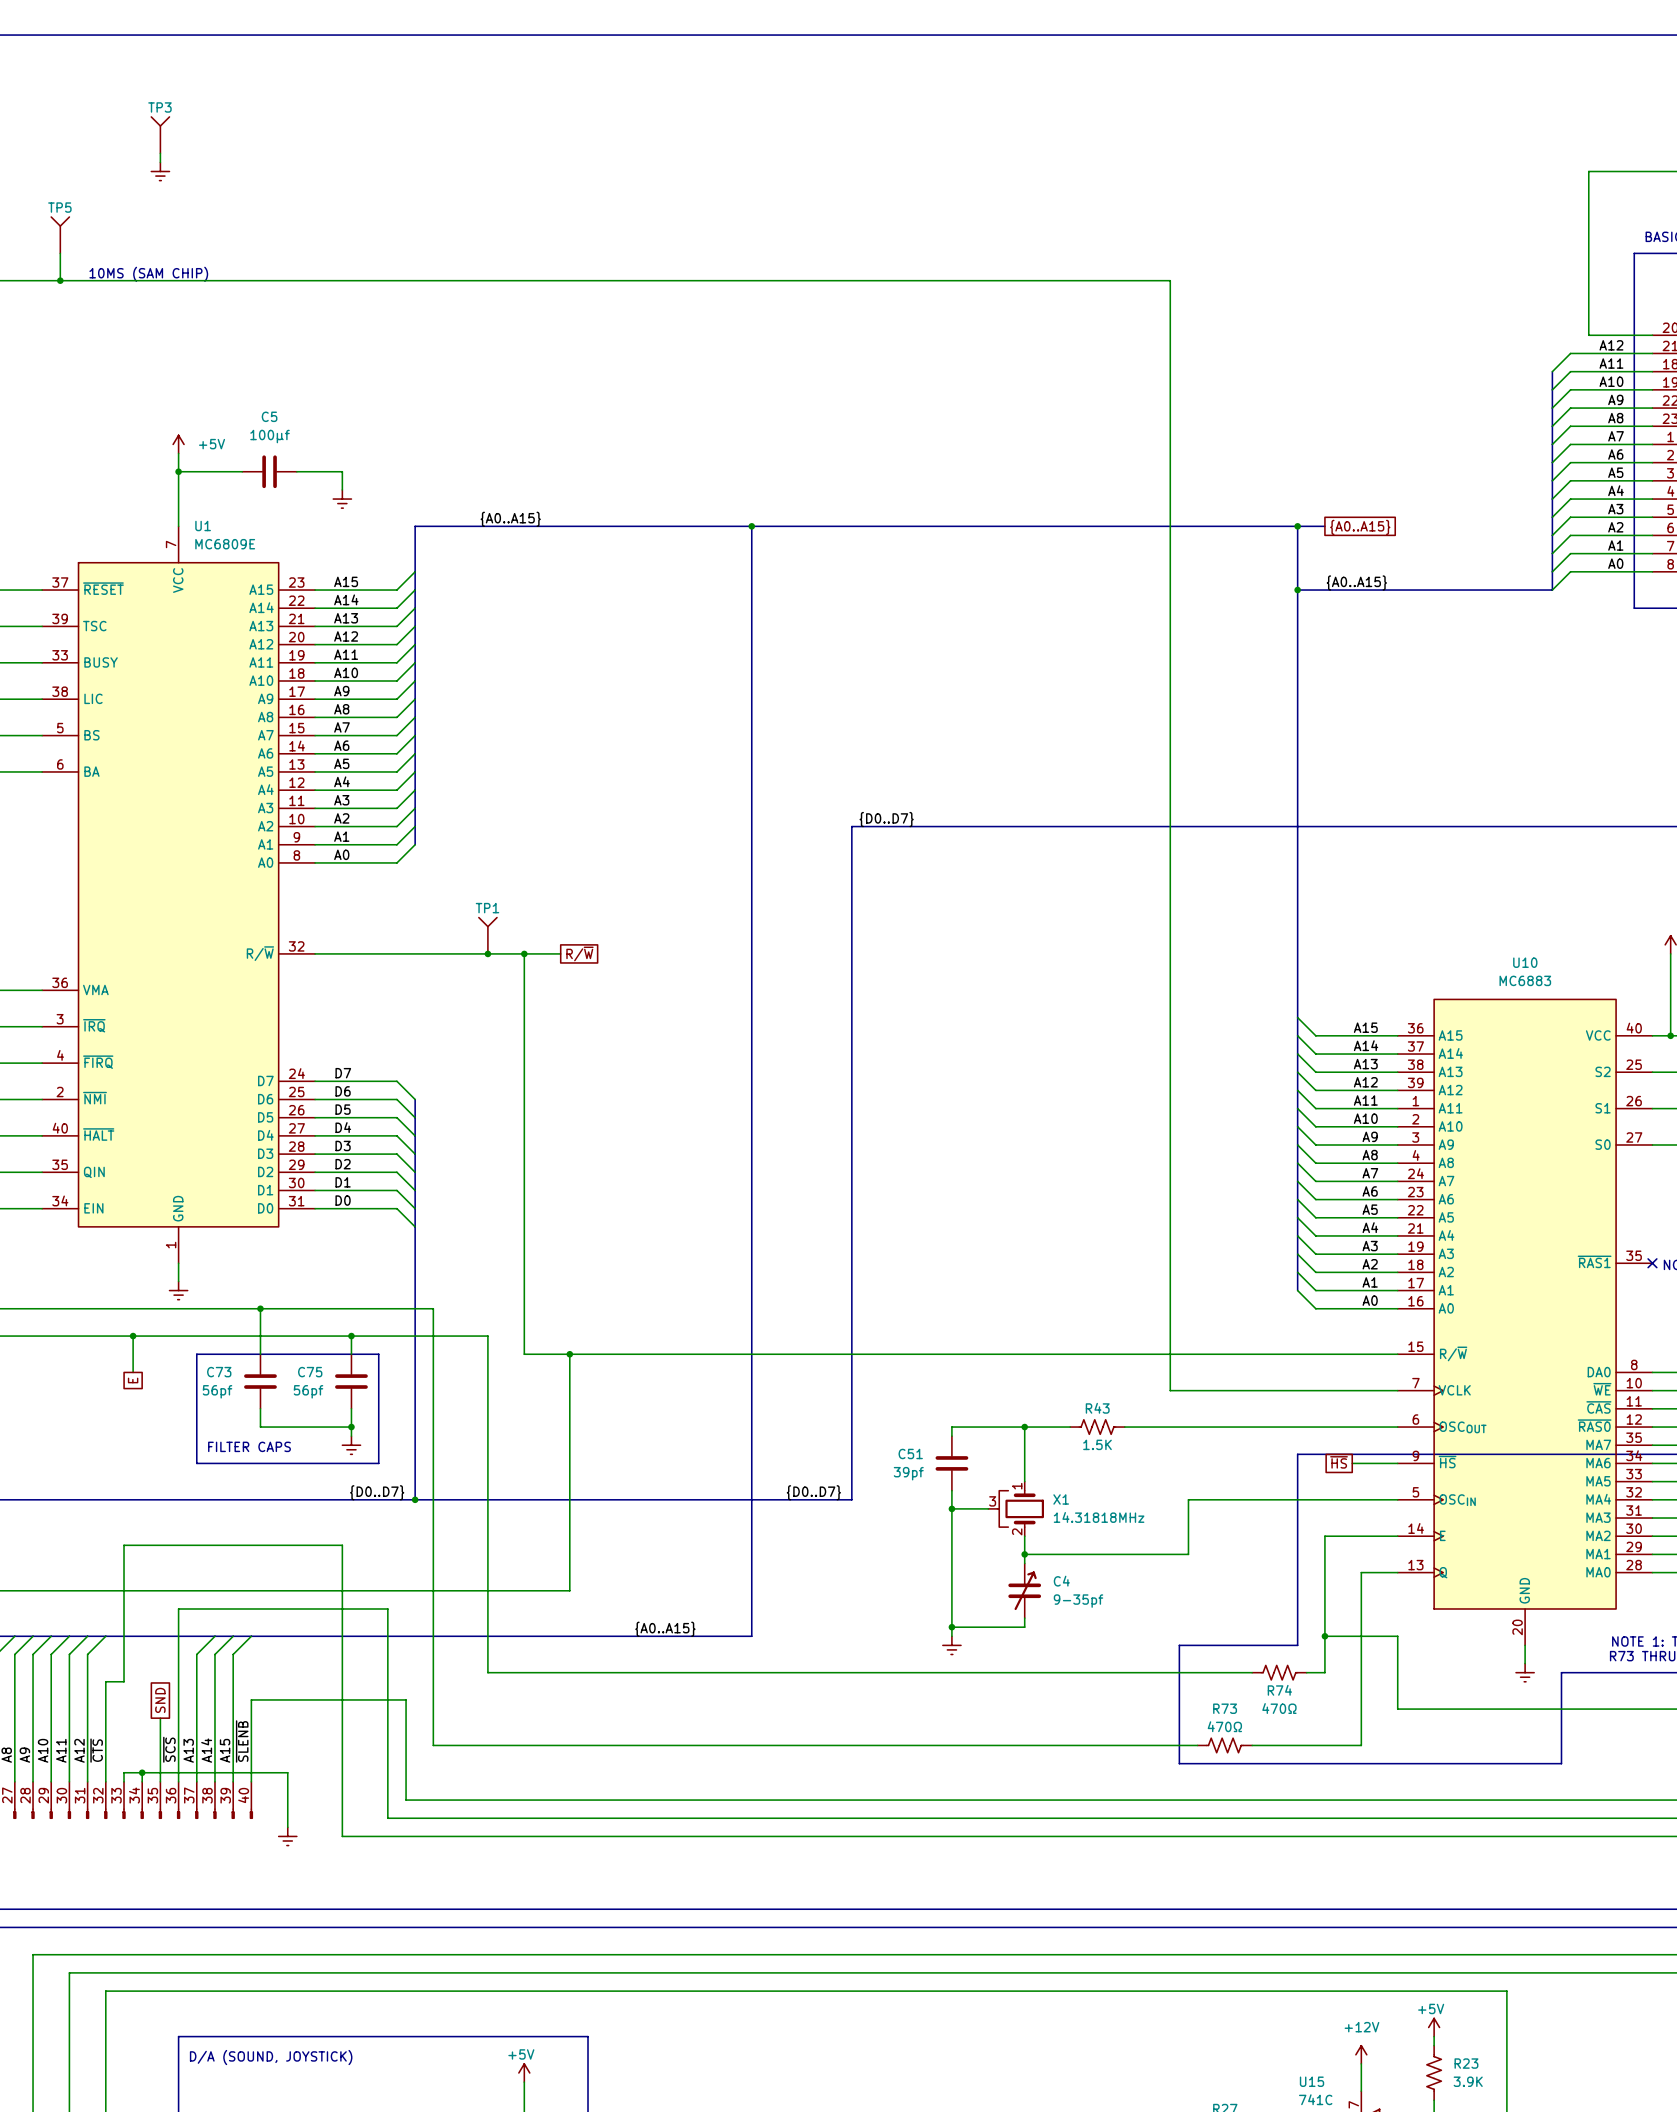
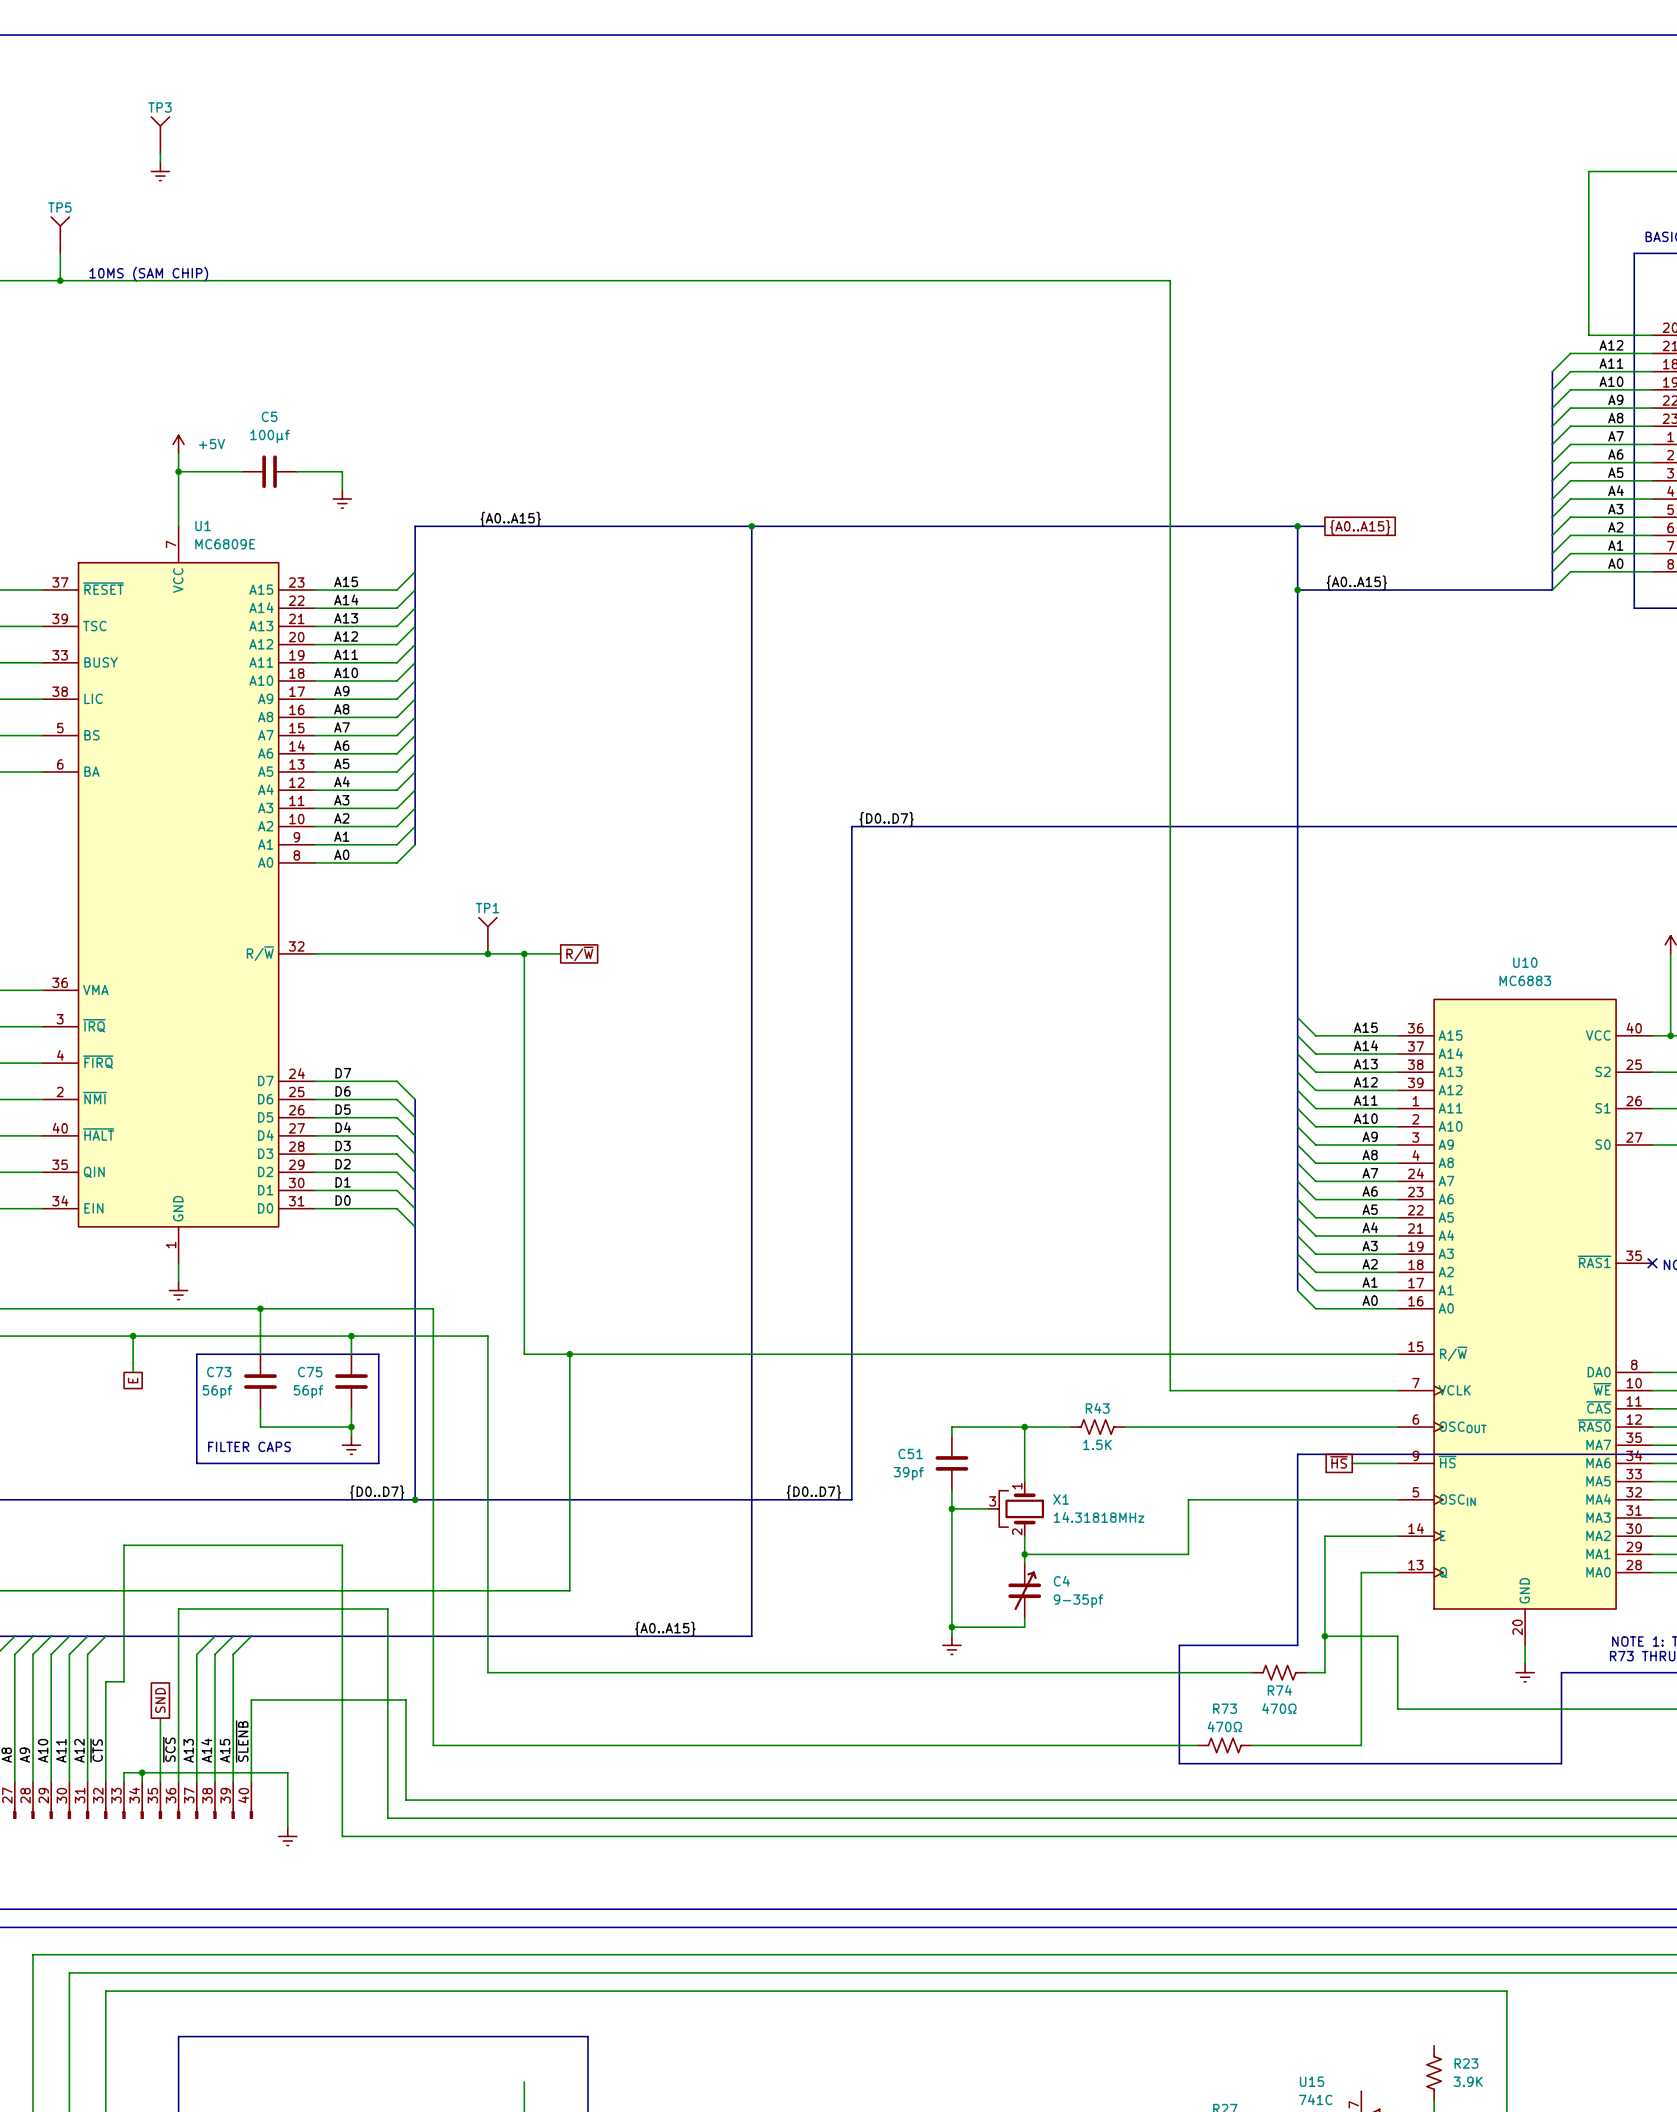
power symbol: +5V (1434, 2027) -> none
wire: (1434, 2036) (1434, 2045) -> none
power symbol: +12V (1361, 2054) -> none
text: D/A (SOUND, JOYSTICK) (271, 2057) -> none
wire: (1361, 2063) (1361, 2091) -> none
power symbol: +5V (524, 2072) -> none

